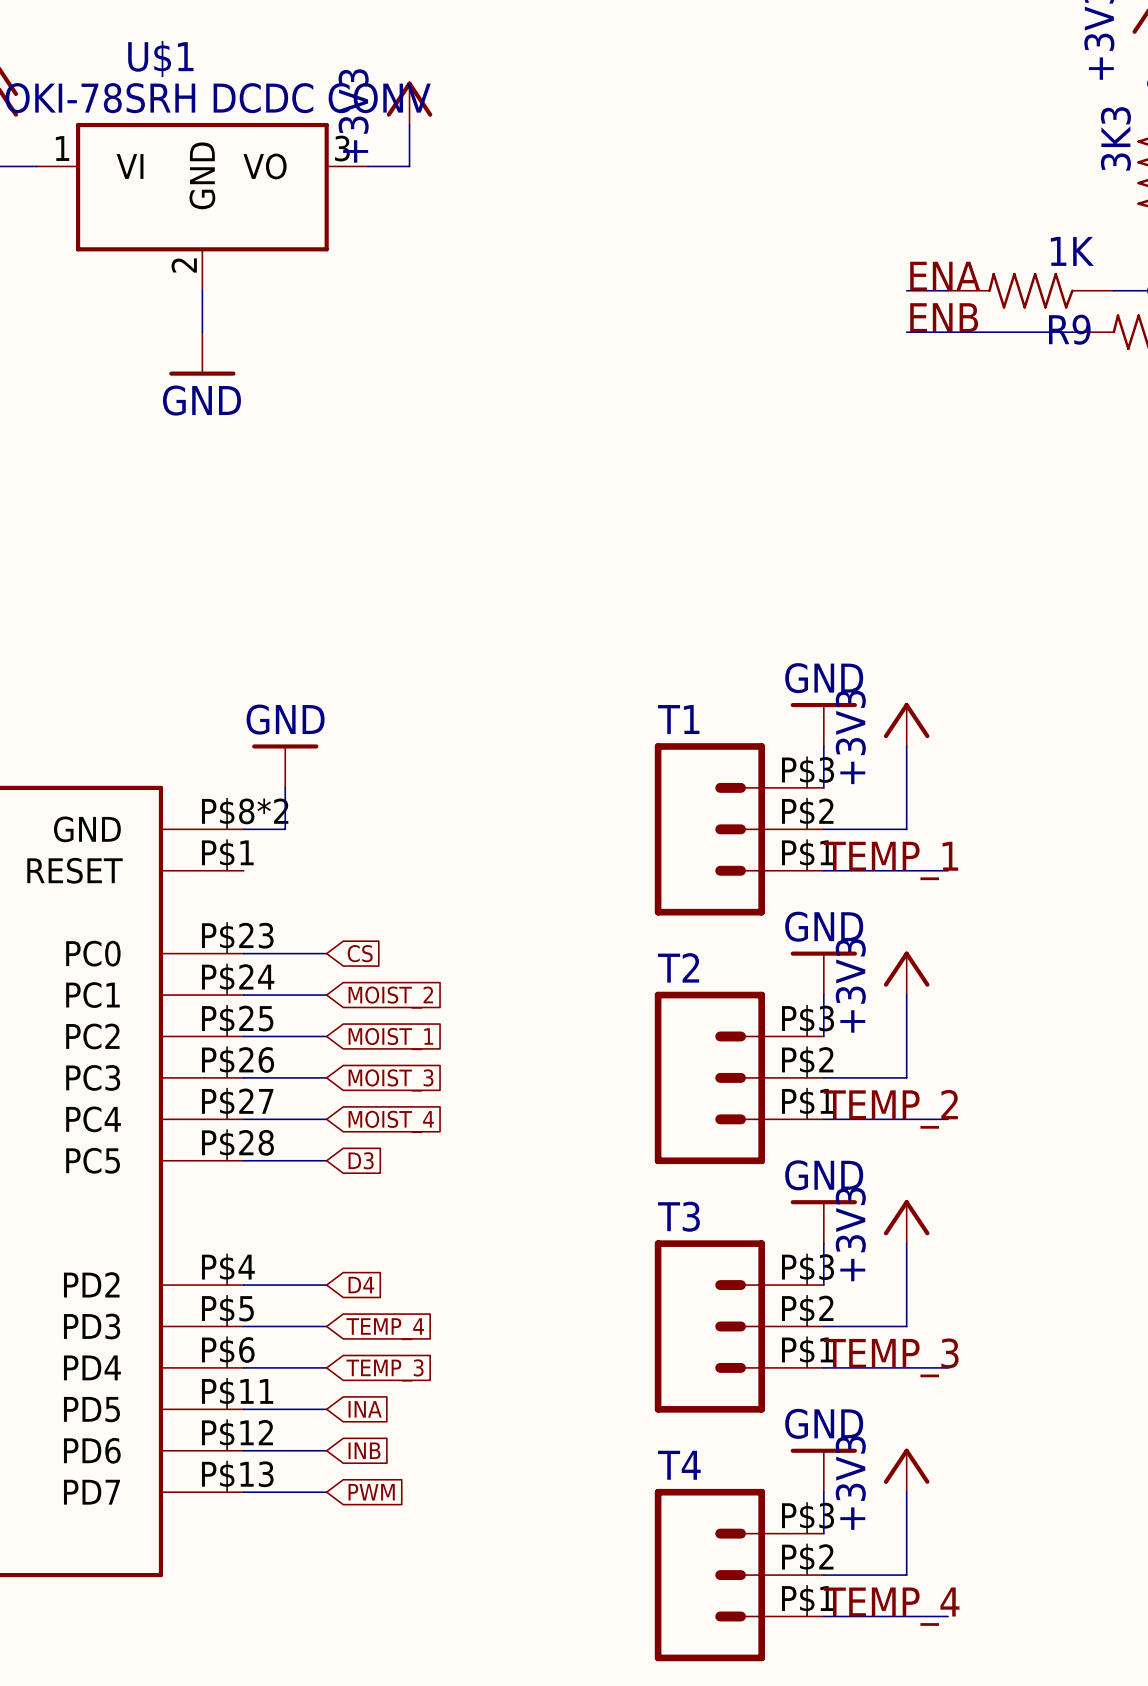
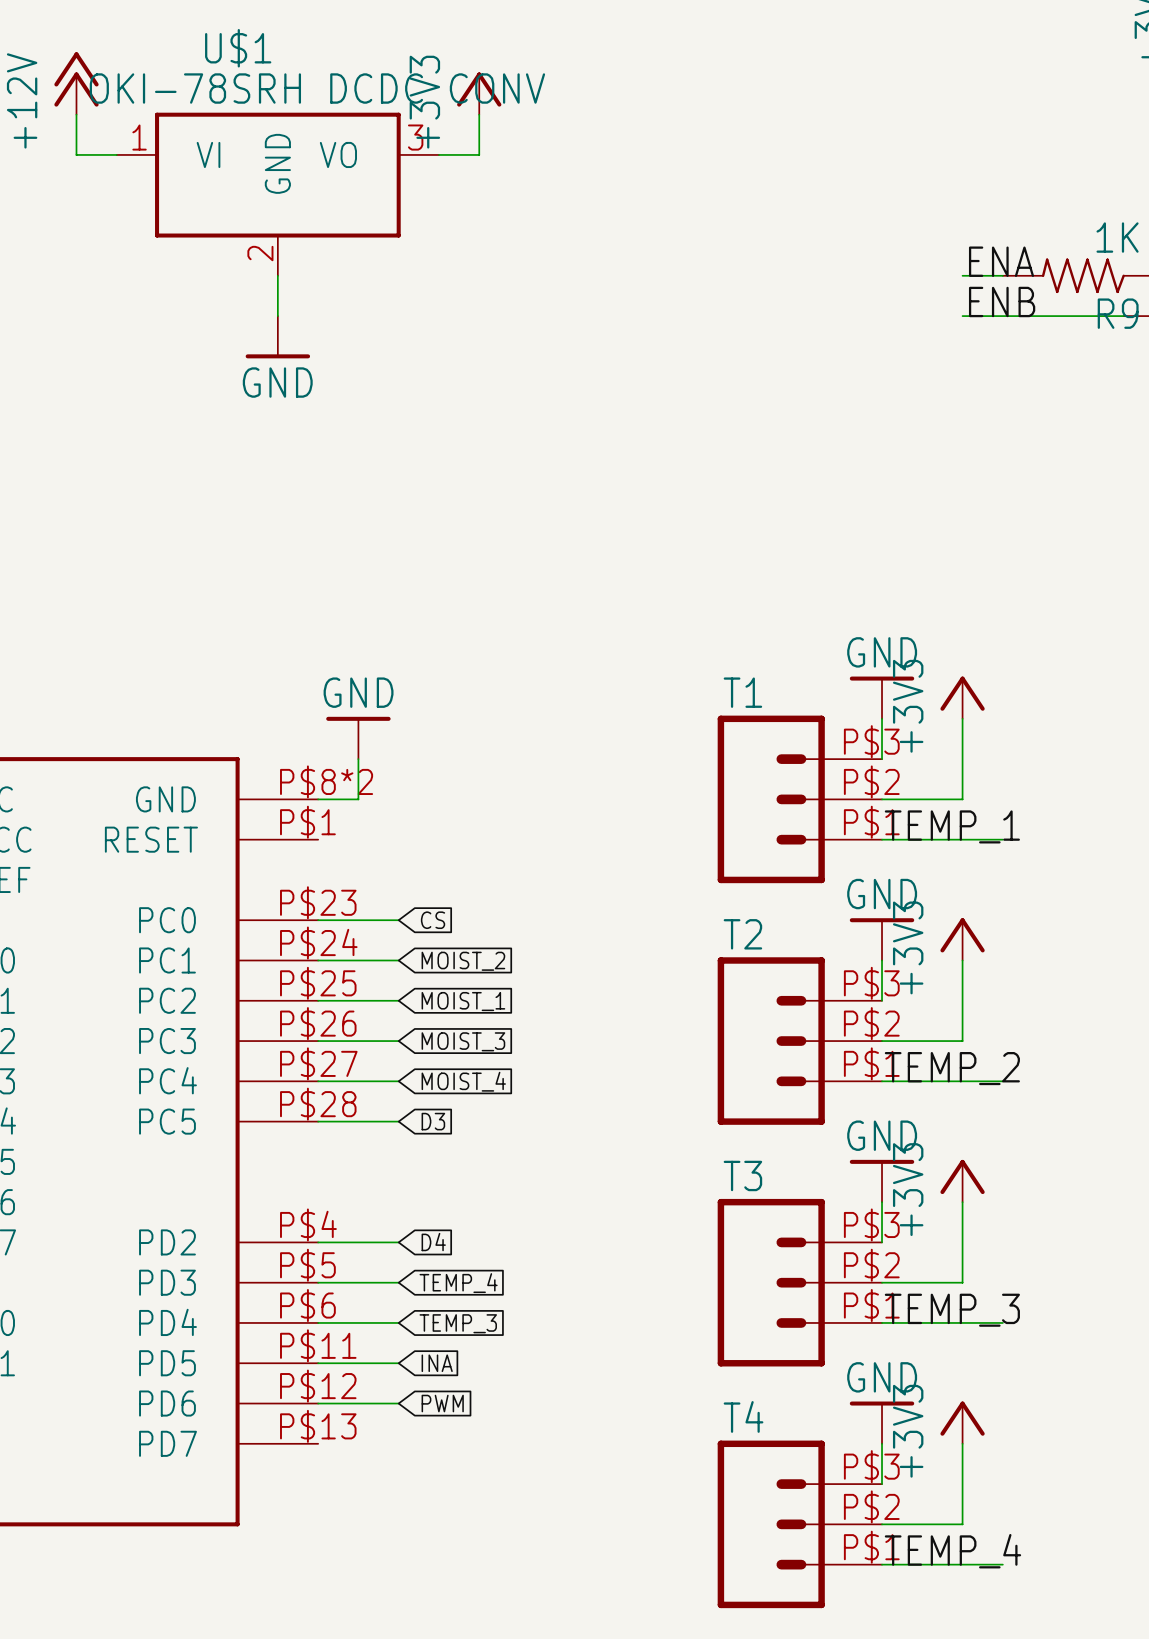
global label: INB (364, 1450) -> PWM (442, 1403)
wire: (243, 1492) (326, 1492) -> none
global label: PWM (371, 1492) -> none

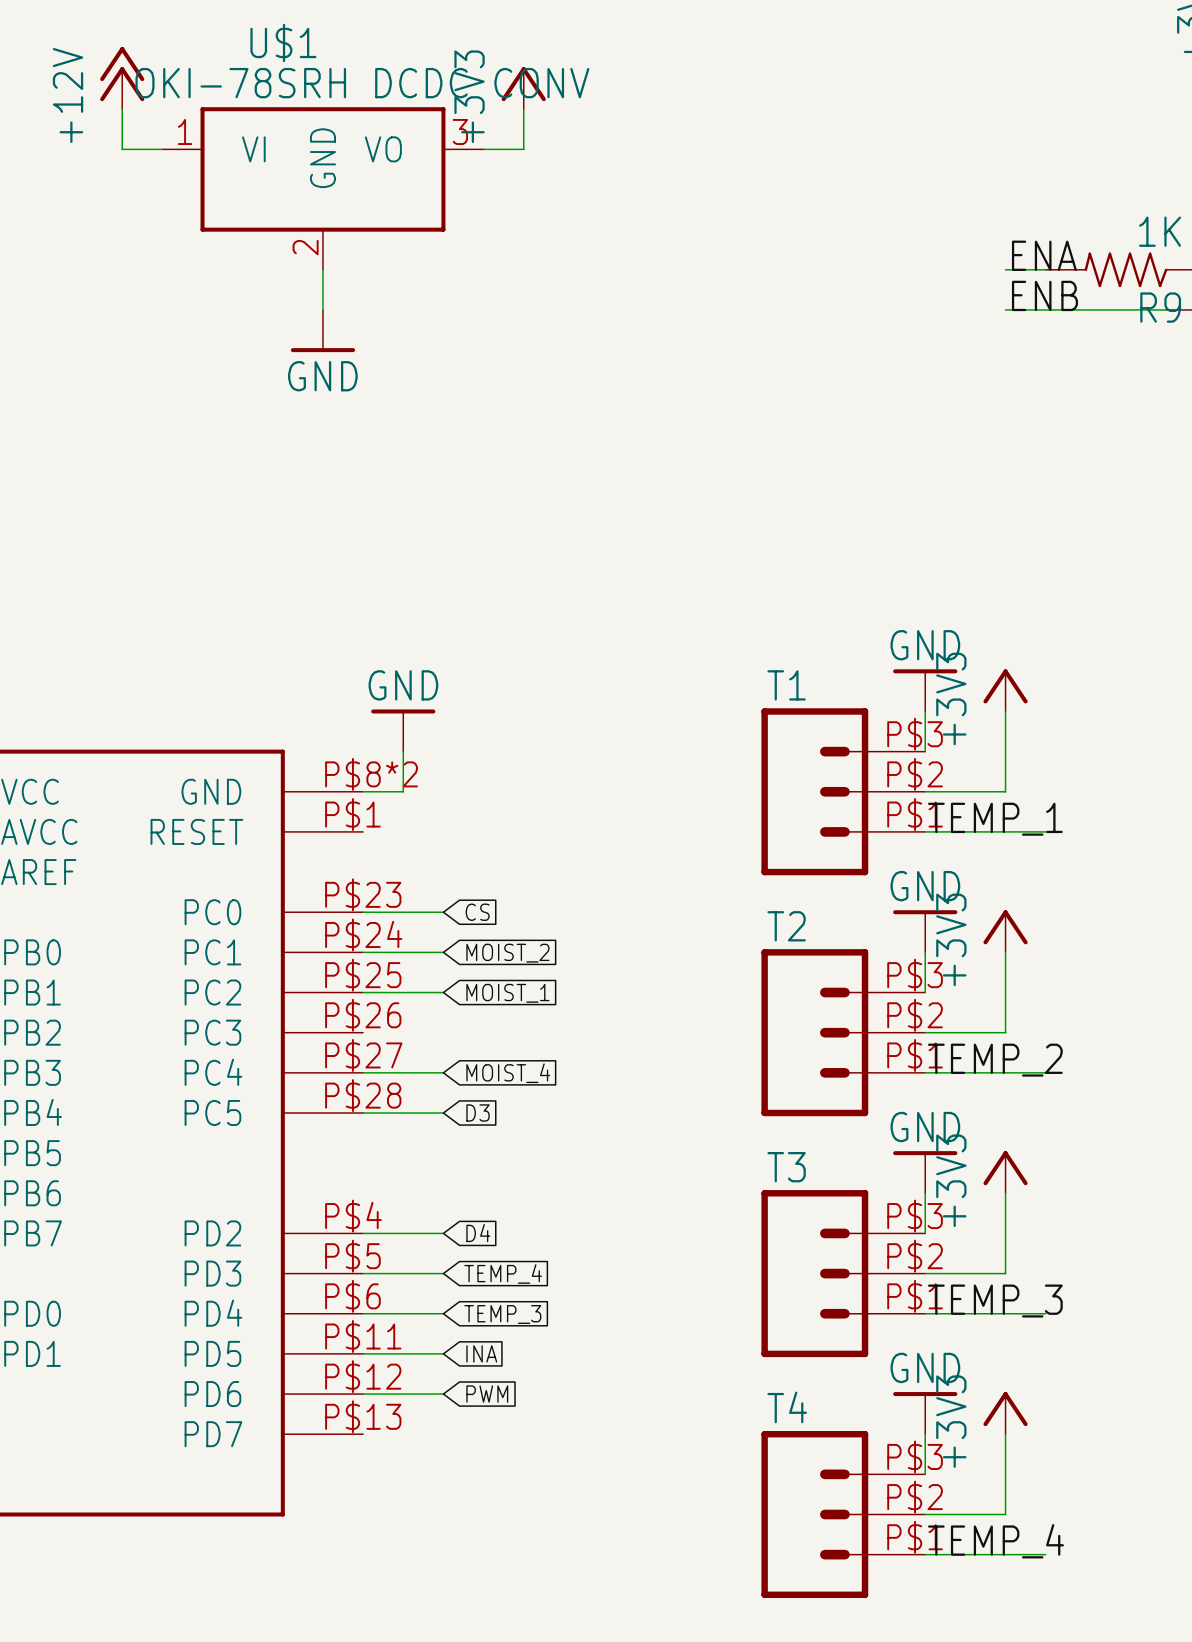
wire: (318, 1041) (398, 1041) -> none
global label: MOIST_3 (463, 1041) -> none

